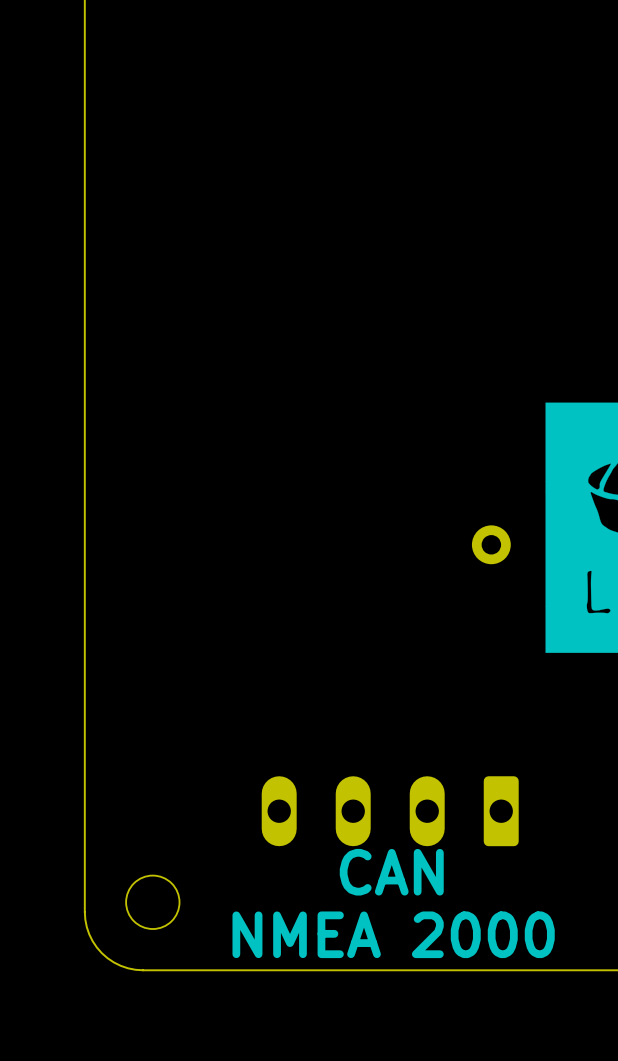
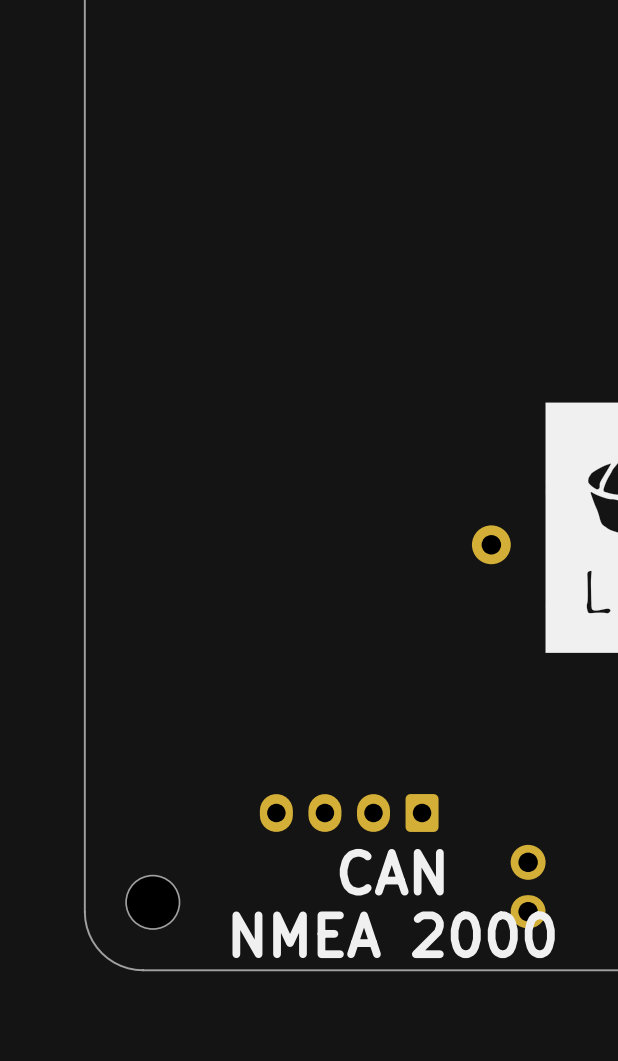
part: (390, 811) -> none
part: none -> (349, 813)
part: none -> (528, 886)

